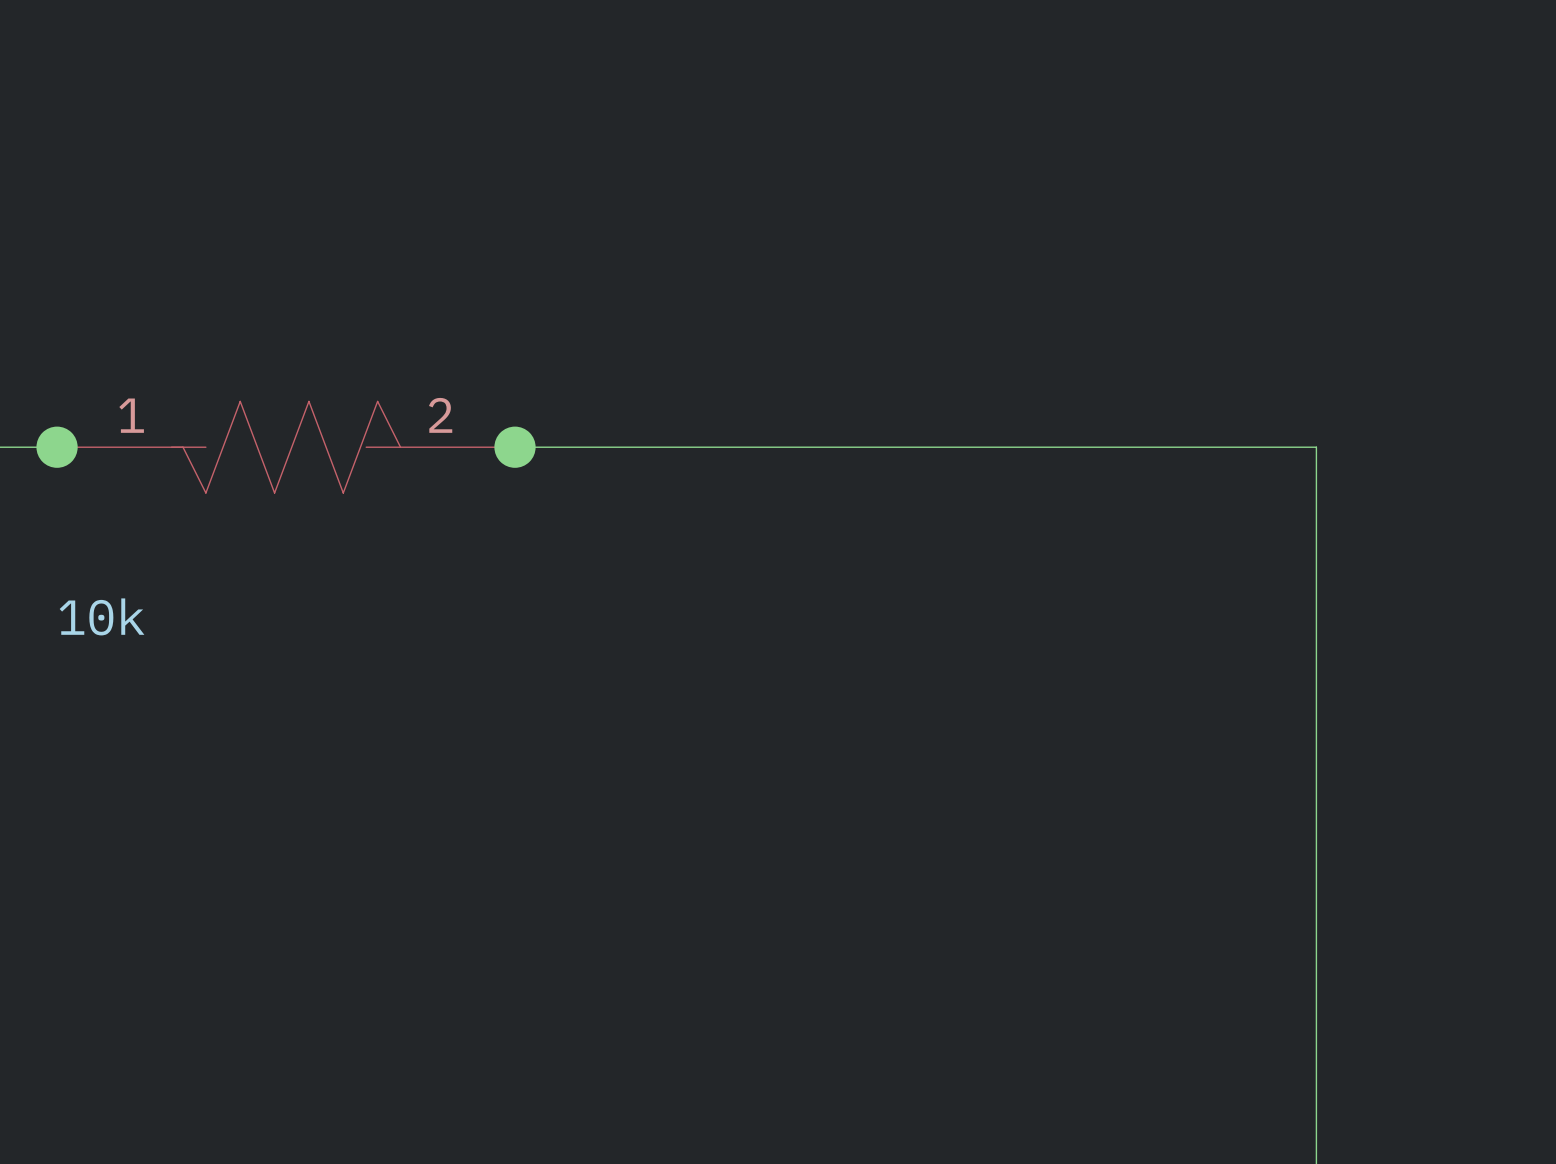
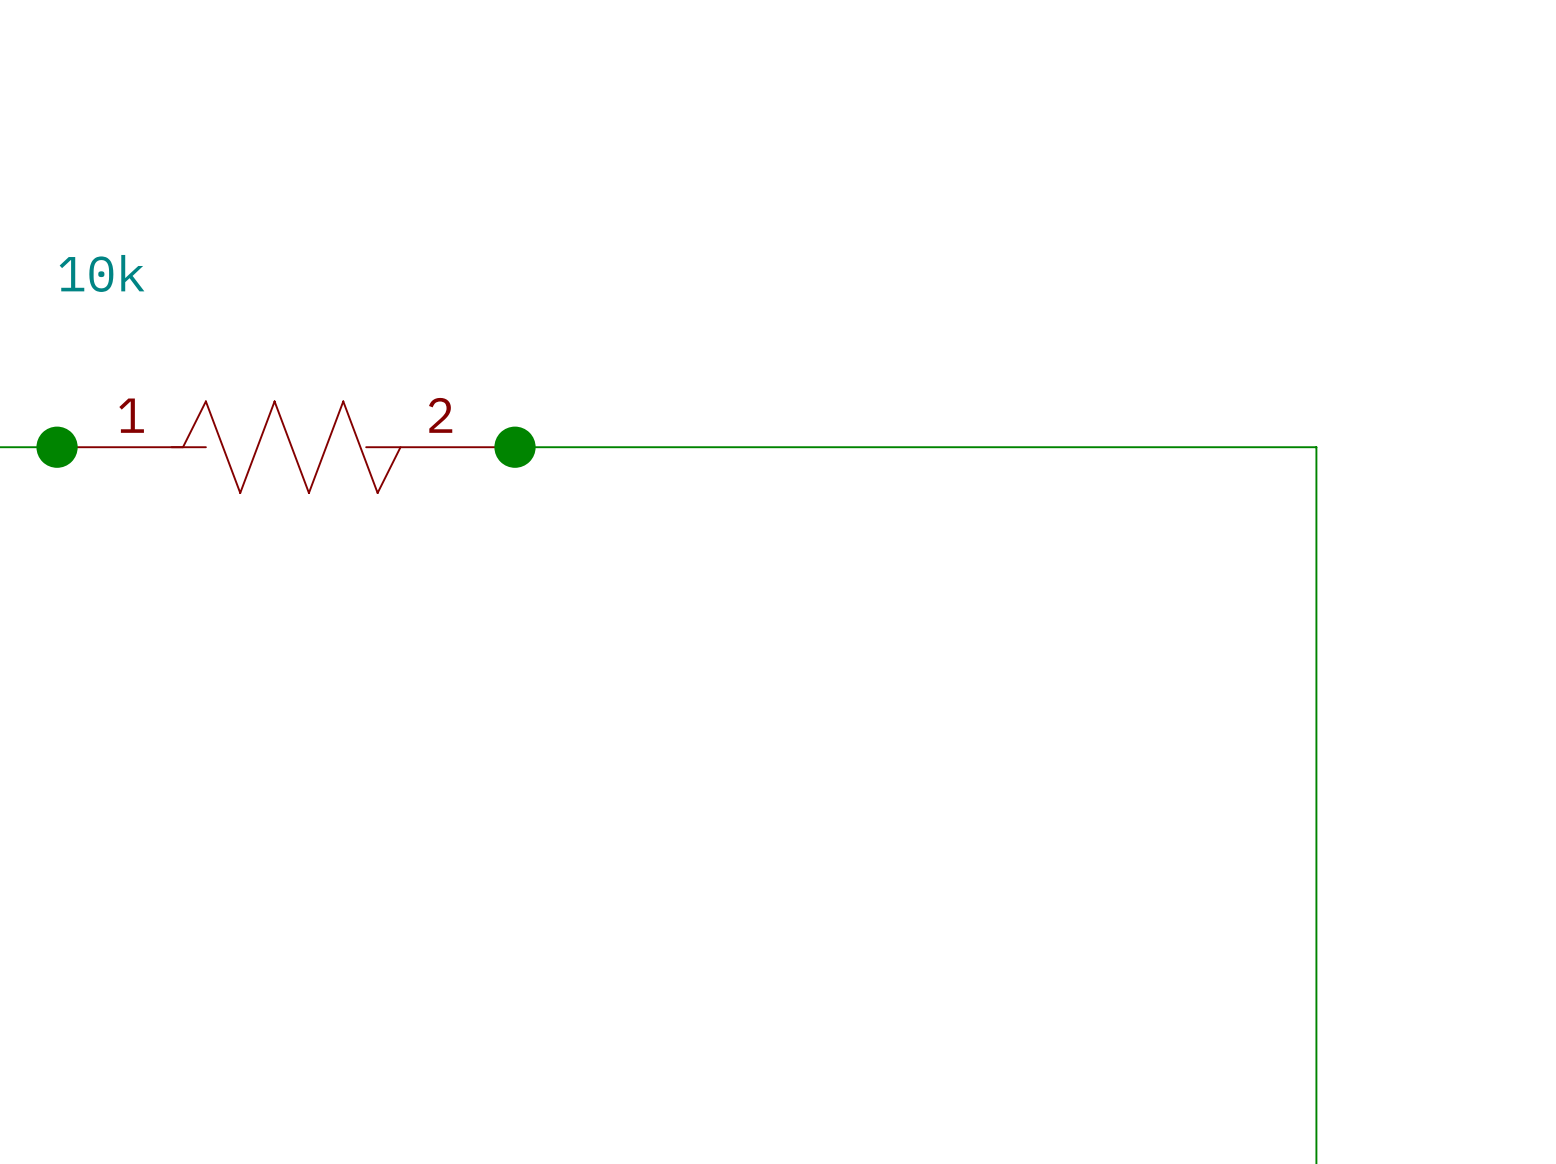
part flip: as is (286, 447) -> up-down (286, 447)

